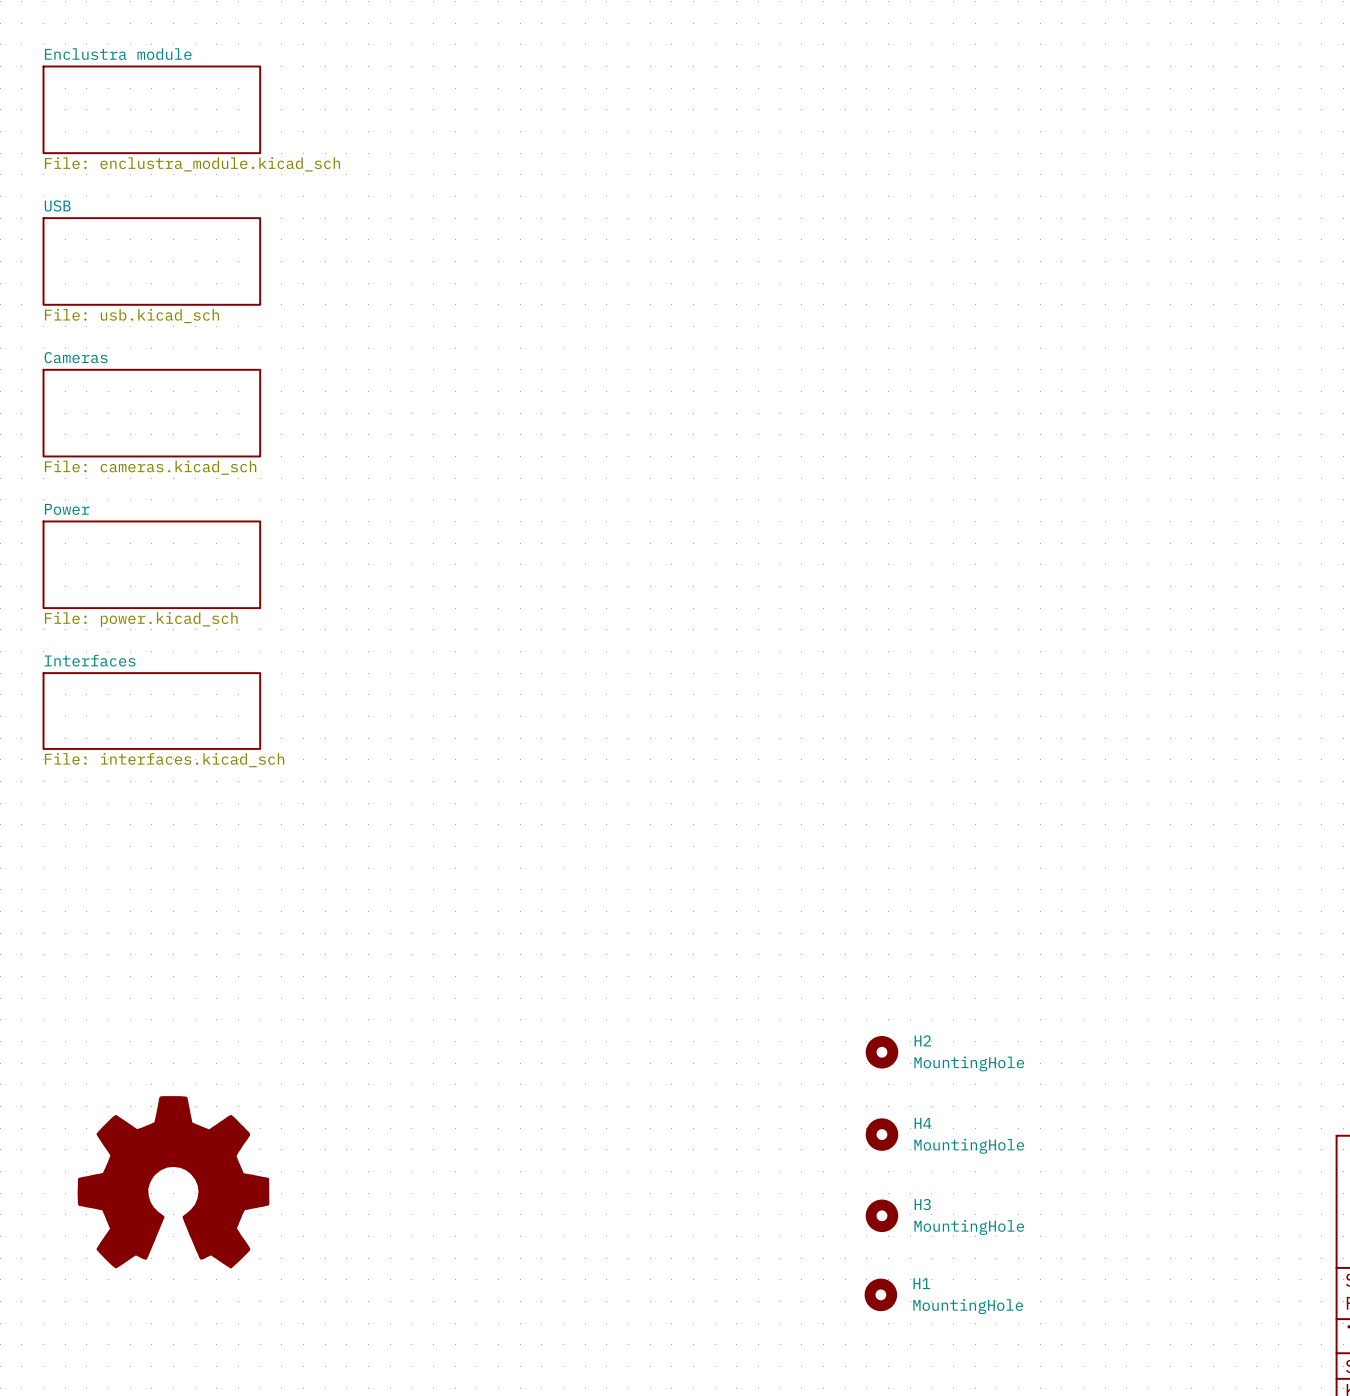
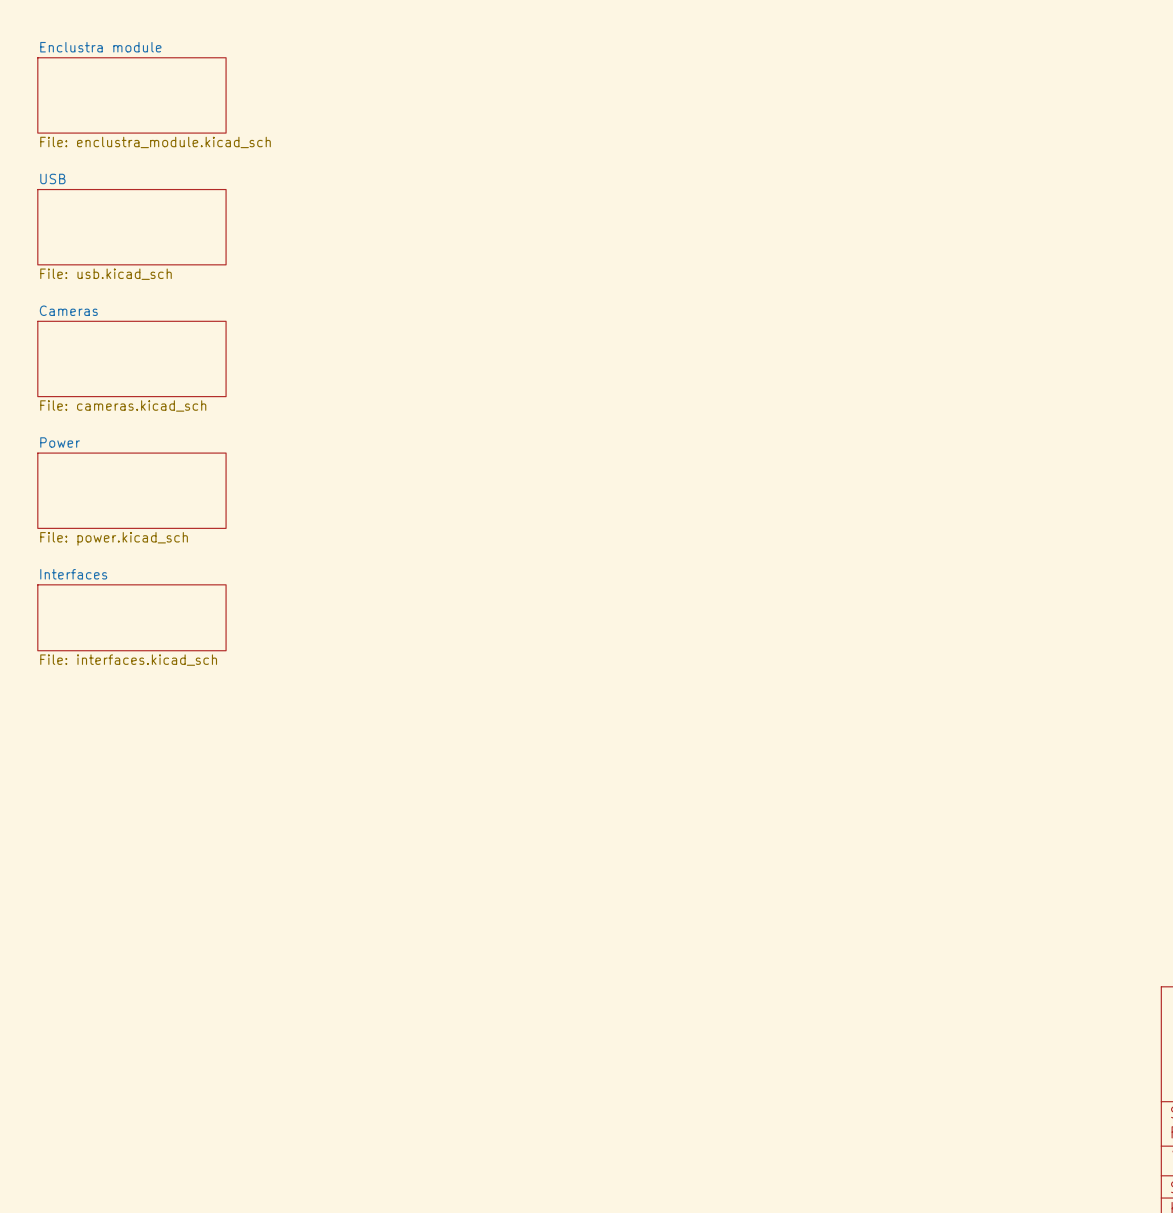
H2: MountingHole (881, 1052) -> none
H4: MountingHole (881, 1134) -> none
part: (173, 1182) -> none
H3: MountingHole (881, 1215) -> none
H1: MountingHole (880, 1294) -> none

